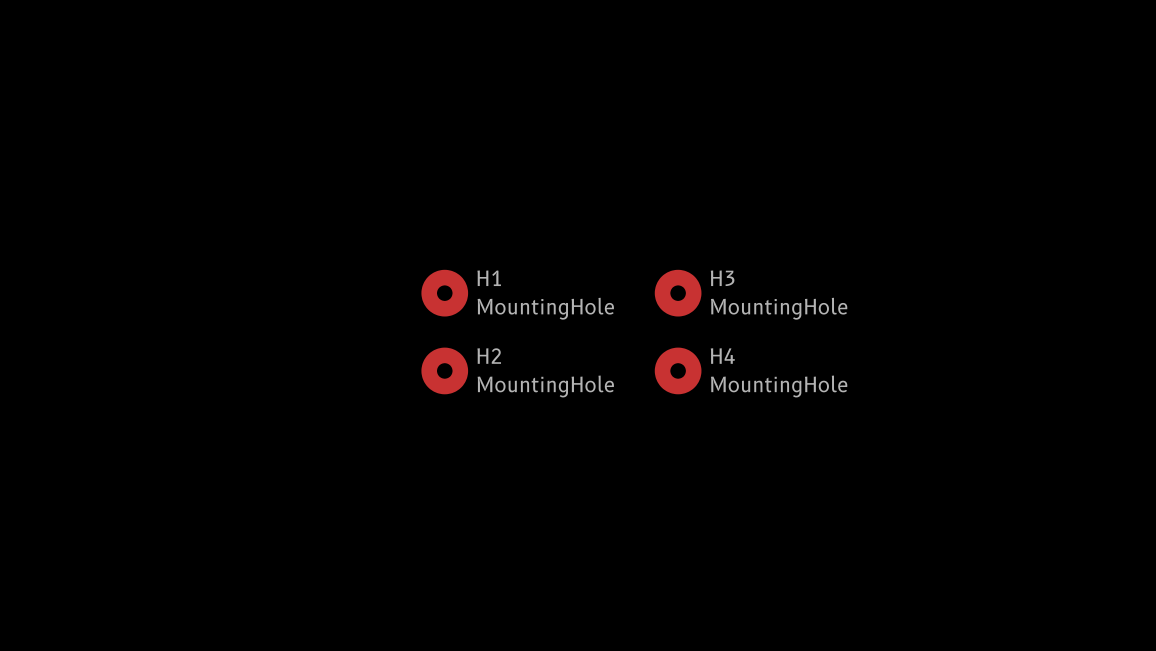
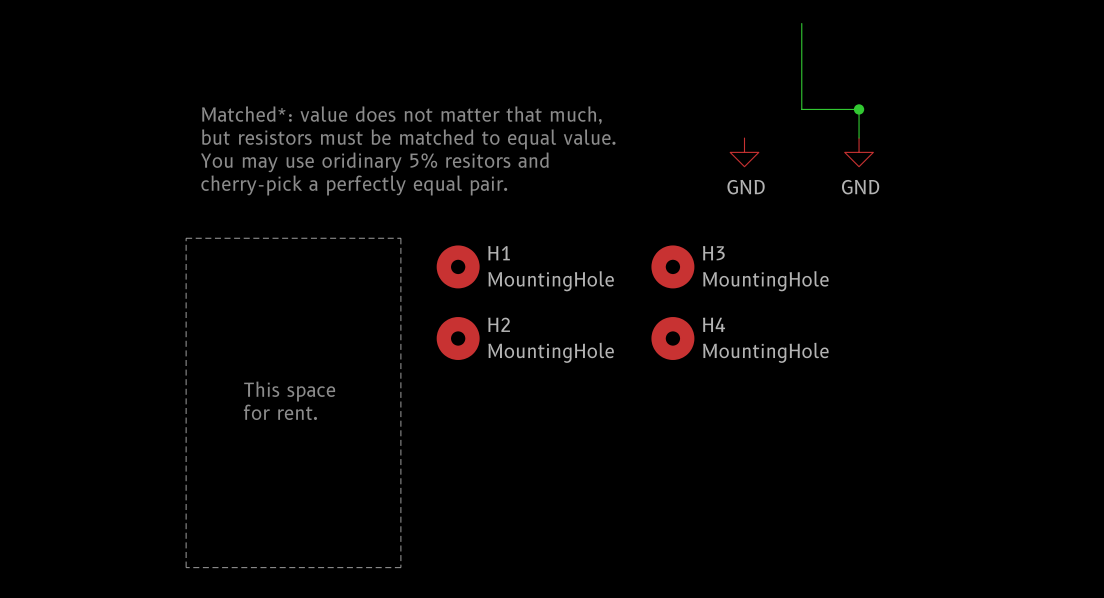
wire: none -> (801, 23) (801, 109) (859, 109) (859, 138)
junction: none -> (859, 109)
text: none -> Matched*: value does not matter that much, (401, 115)
text: none -> but resistors must be matched to equal value. (408, 139)
power symbol: none -> GND (744, 152)
power symbol: none -> GND (859, 152)
text: none -> You may use oridinary 5% resitors and (374, 162)
text: none -> cherry-pick a perfectly equal pair. (354, 185)
line: none -> (186, 238) (400, 238) (400, 567) (186, 567) (186, 238)
text: none -> This space (289, 391)
text: none -> for rent. (280, 412)

